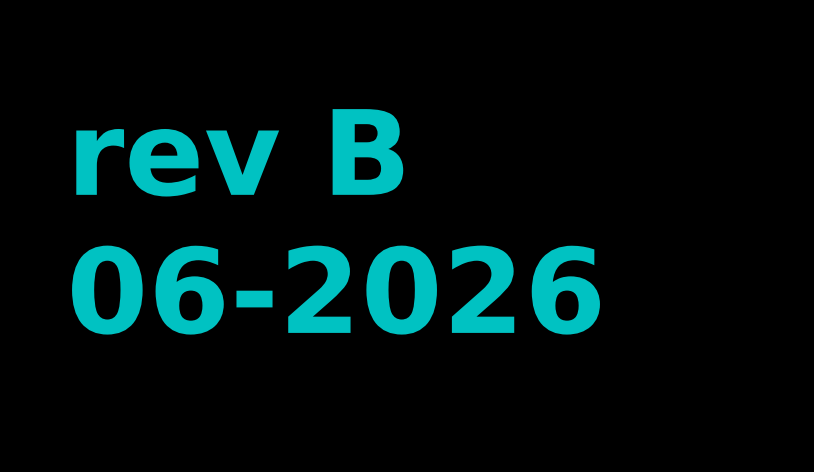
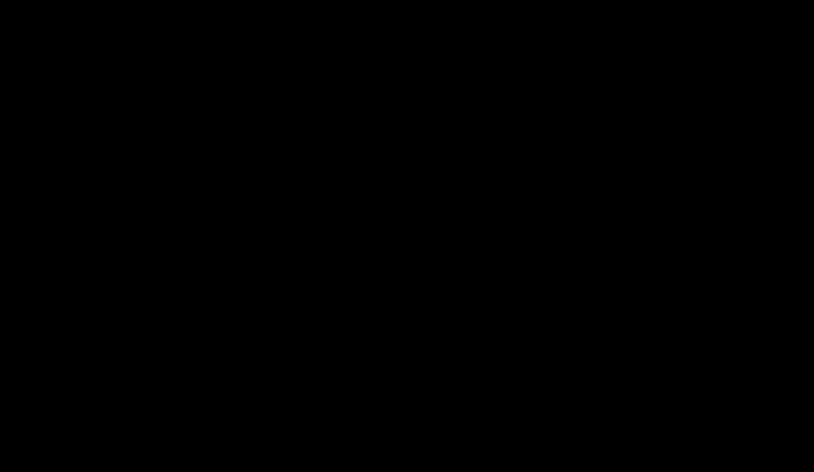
text: rev B (239, 152) -> none
text: 06-2026 (336, 290) -> none

